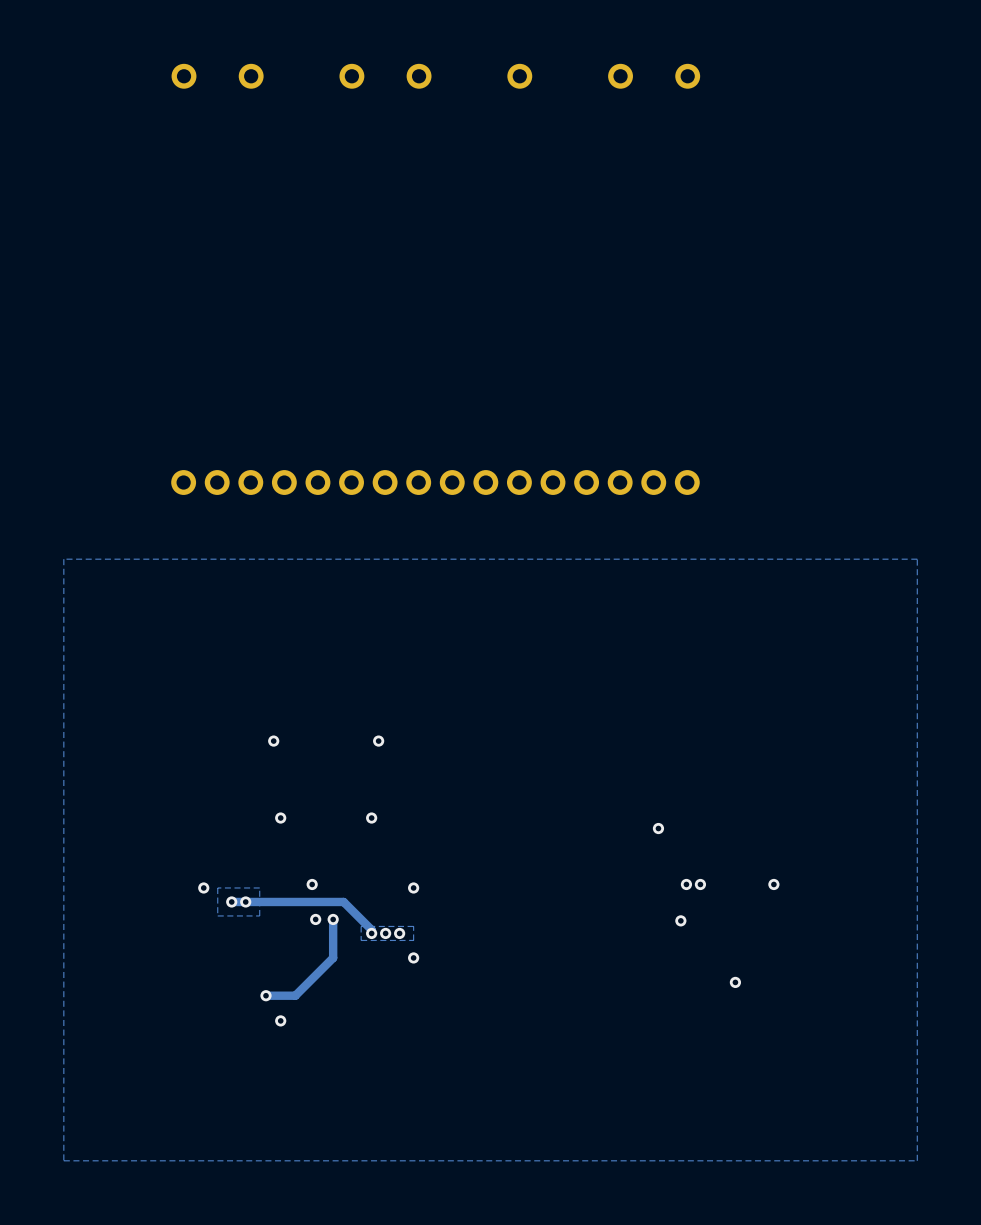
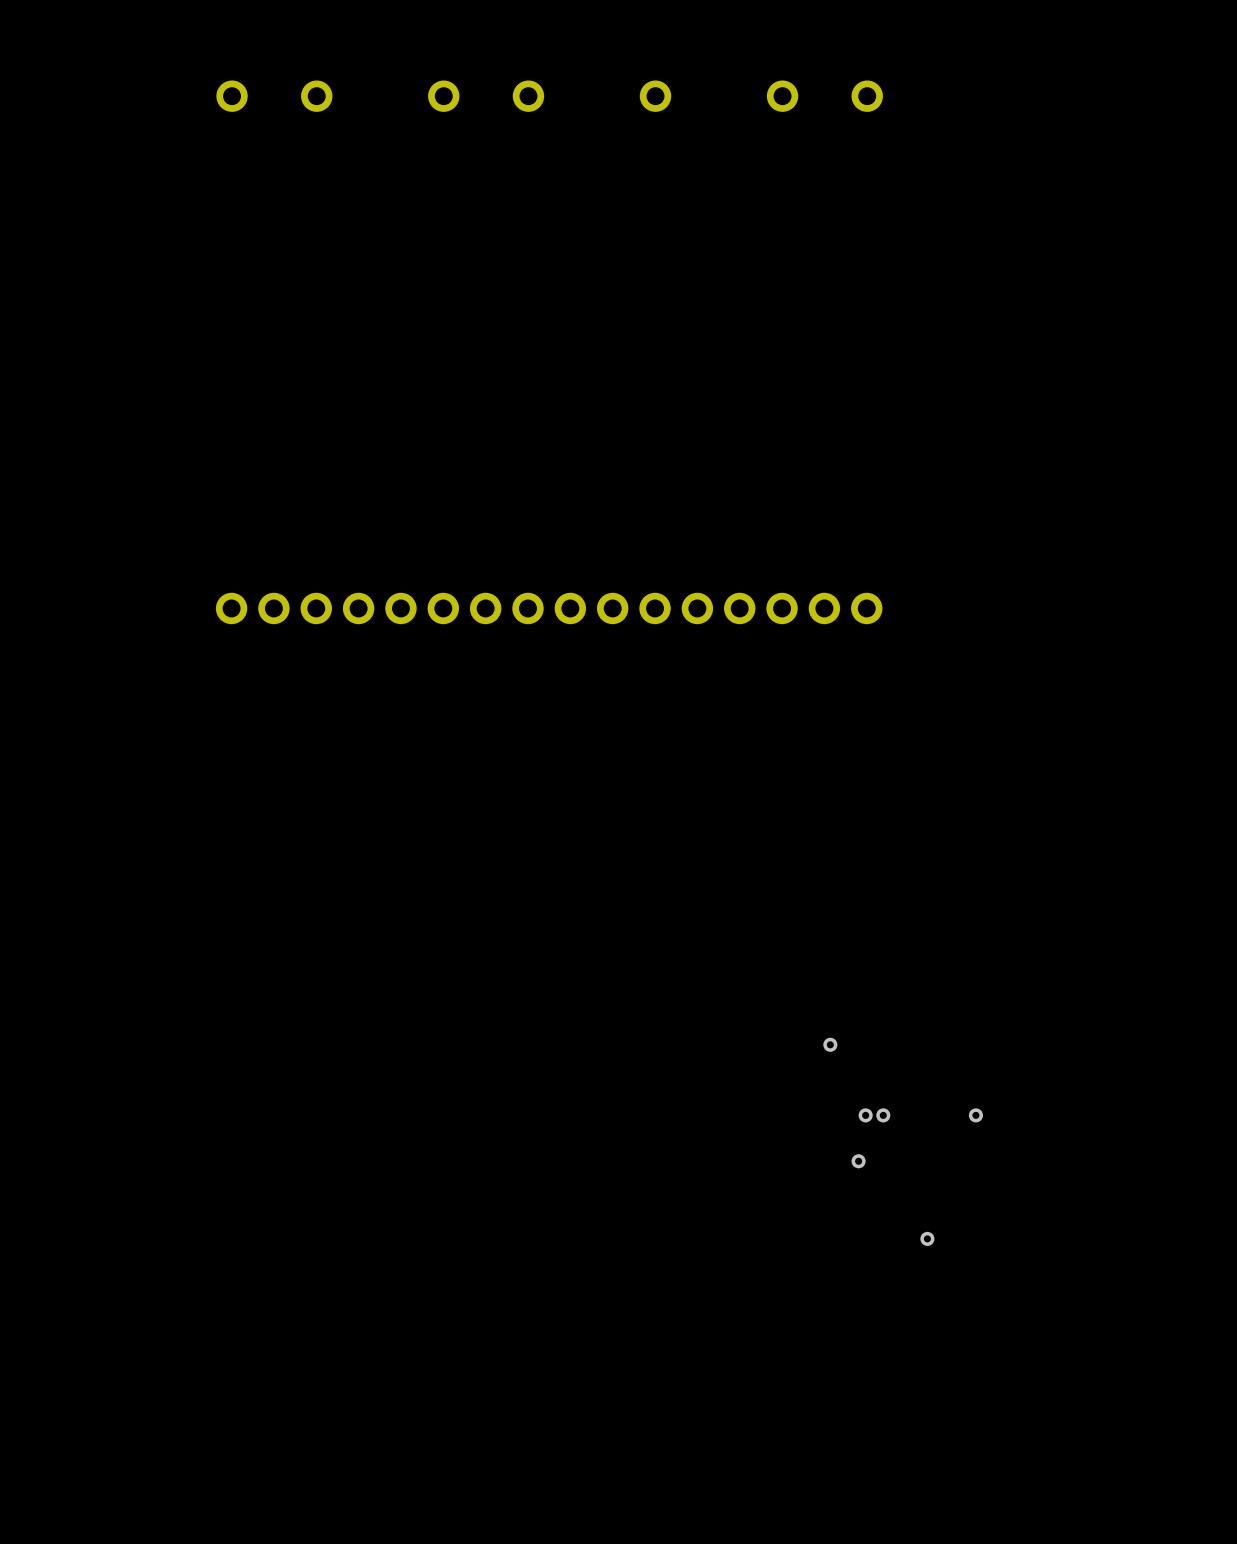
zone outline: (917, 559) (917, 1160) (63, 1160) (63, 559) (917, 559) -> none
via: (273, 741) -> none
via: (378, 741) -> none
via: (280, 818) -> none
via: (371, 818) -> none
via: (312, 884) -> none
via: (203, 887) -> none
zone outline: (259, 887) (259, 915) (217, 915) (217, 887) (259, 887) -> none
via: (413, 887) -> none
track: (231, 901) (343, 901) (371, 929) (371, 933) -> none
via: (231, 901) -> none
via: (245, 901) -> none
via: (315, 919) -> none
track: (333, 919) (333, 957) (295, 995) (266, 995) -> none
via: (333, 919) -> none
zone outline: (413, 926) (413, 940) (361, 940) (361, 926) (413, 926) -> none
via: (371, 933) -> none
via: (385, 933) -> none
via: (399, 933) -> none
via: (413, 957) -> none
via: (266, 995) -> none
via: (280, 1020) -> none

